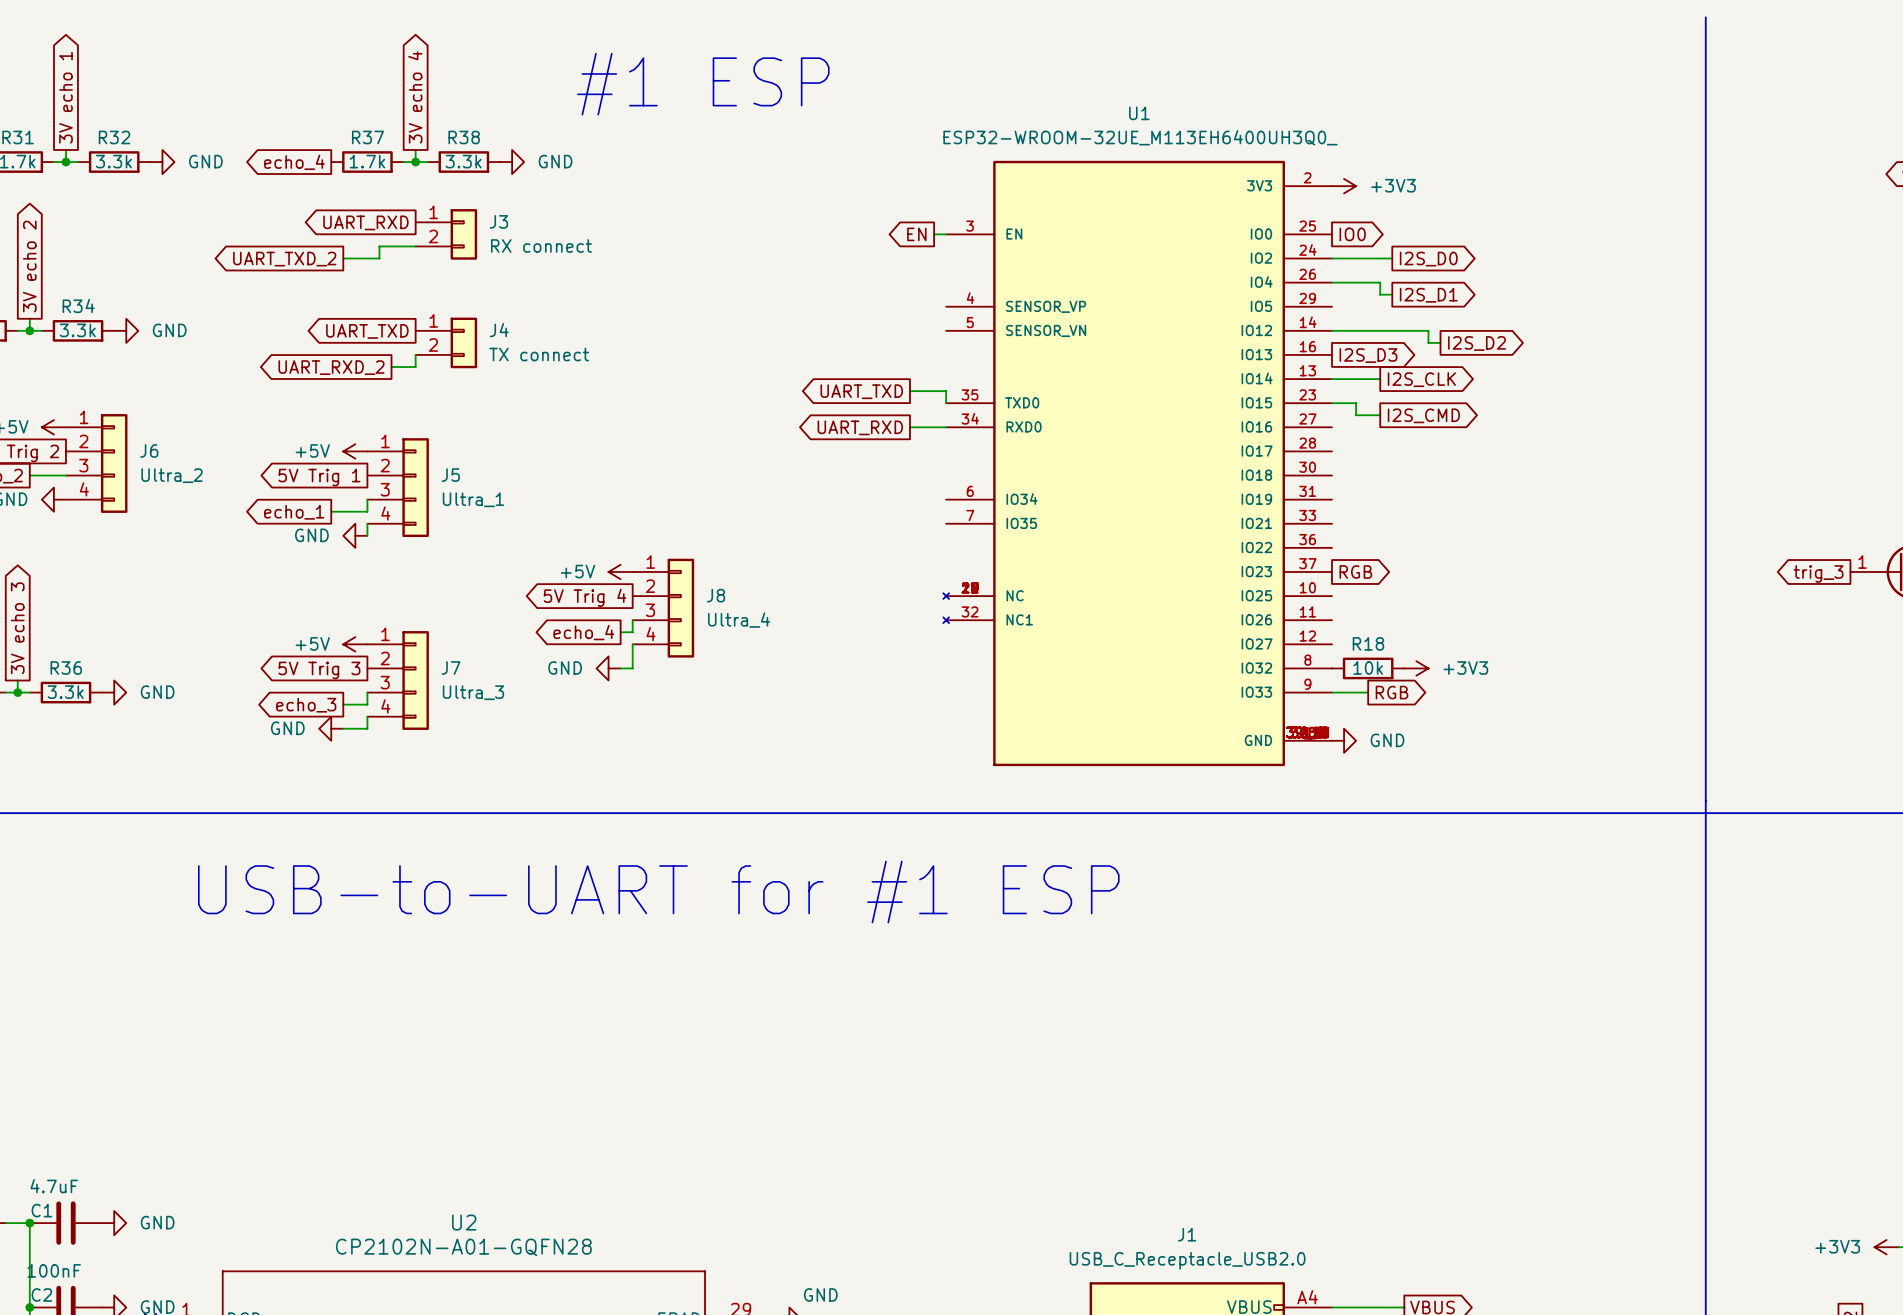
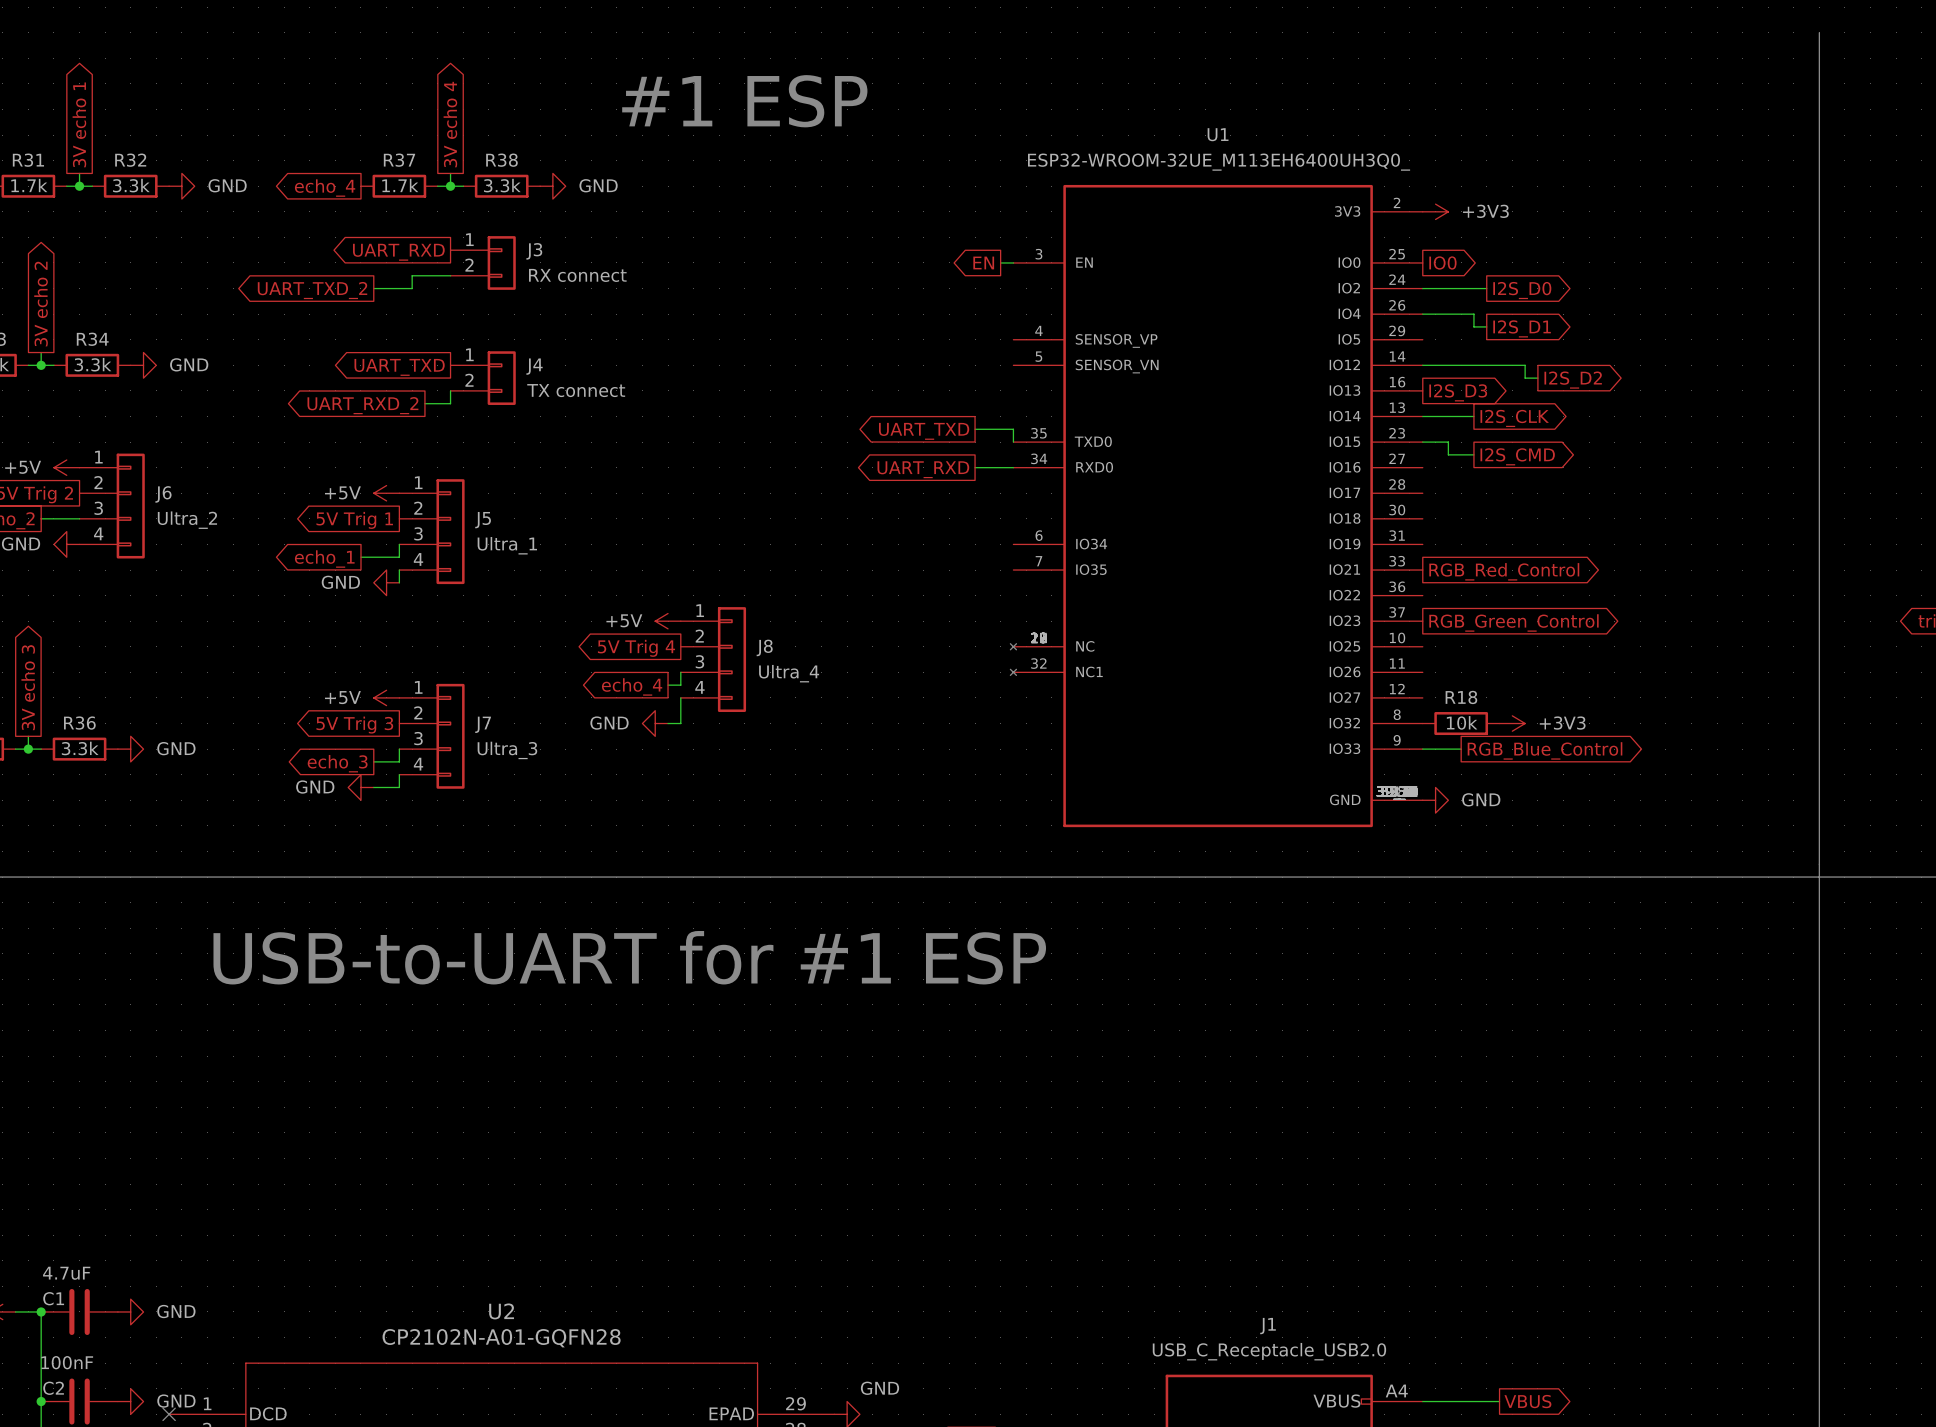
global label: none -> RGB_Red_Control (1504, 571)
global label: RGB (1355, 571) -> RGB_Green_Control (1513, 622)
global label: RGB (1392, 692) -> RGB_Blue_Control (1545, 750)

